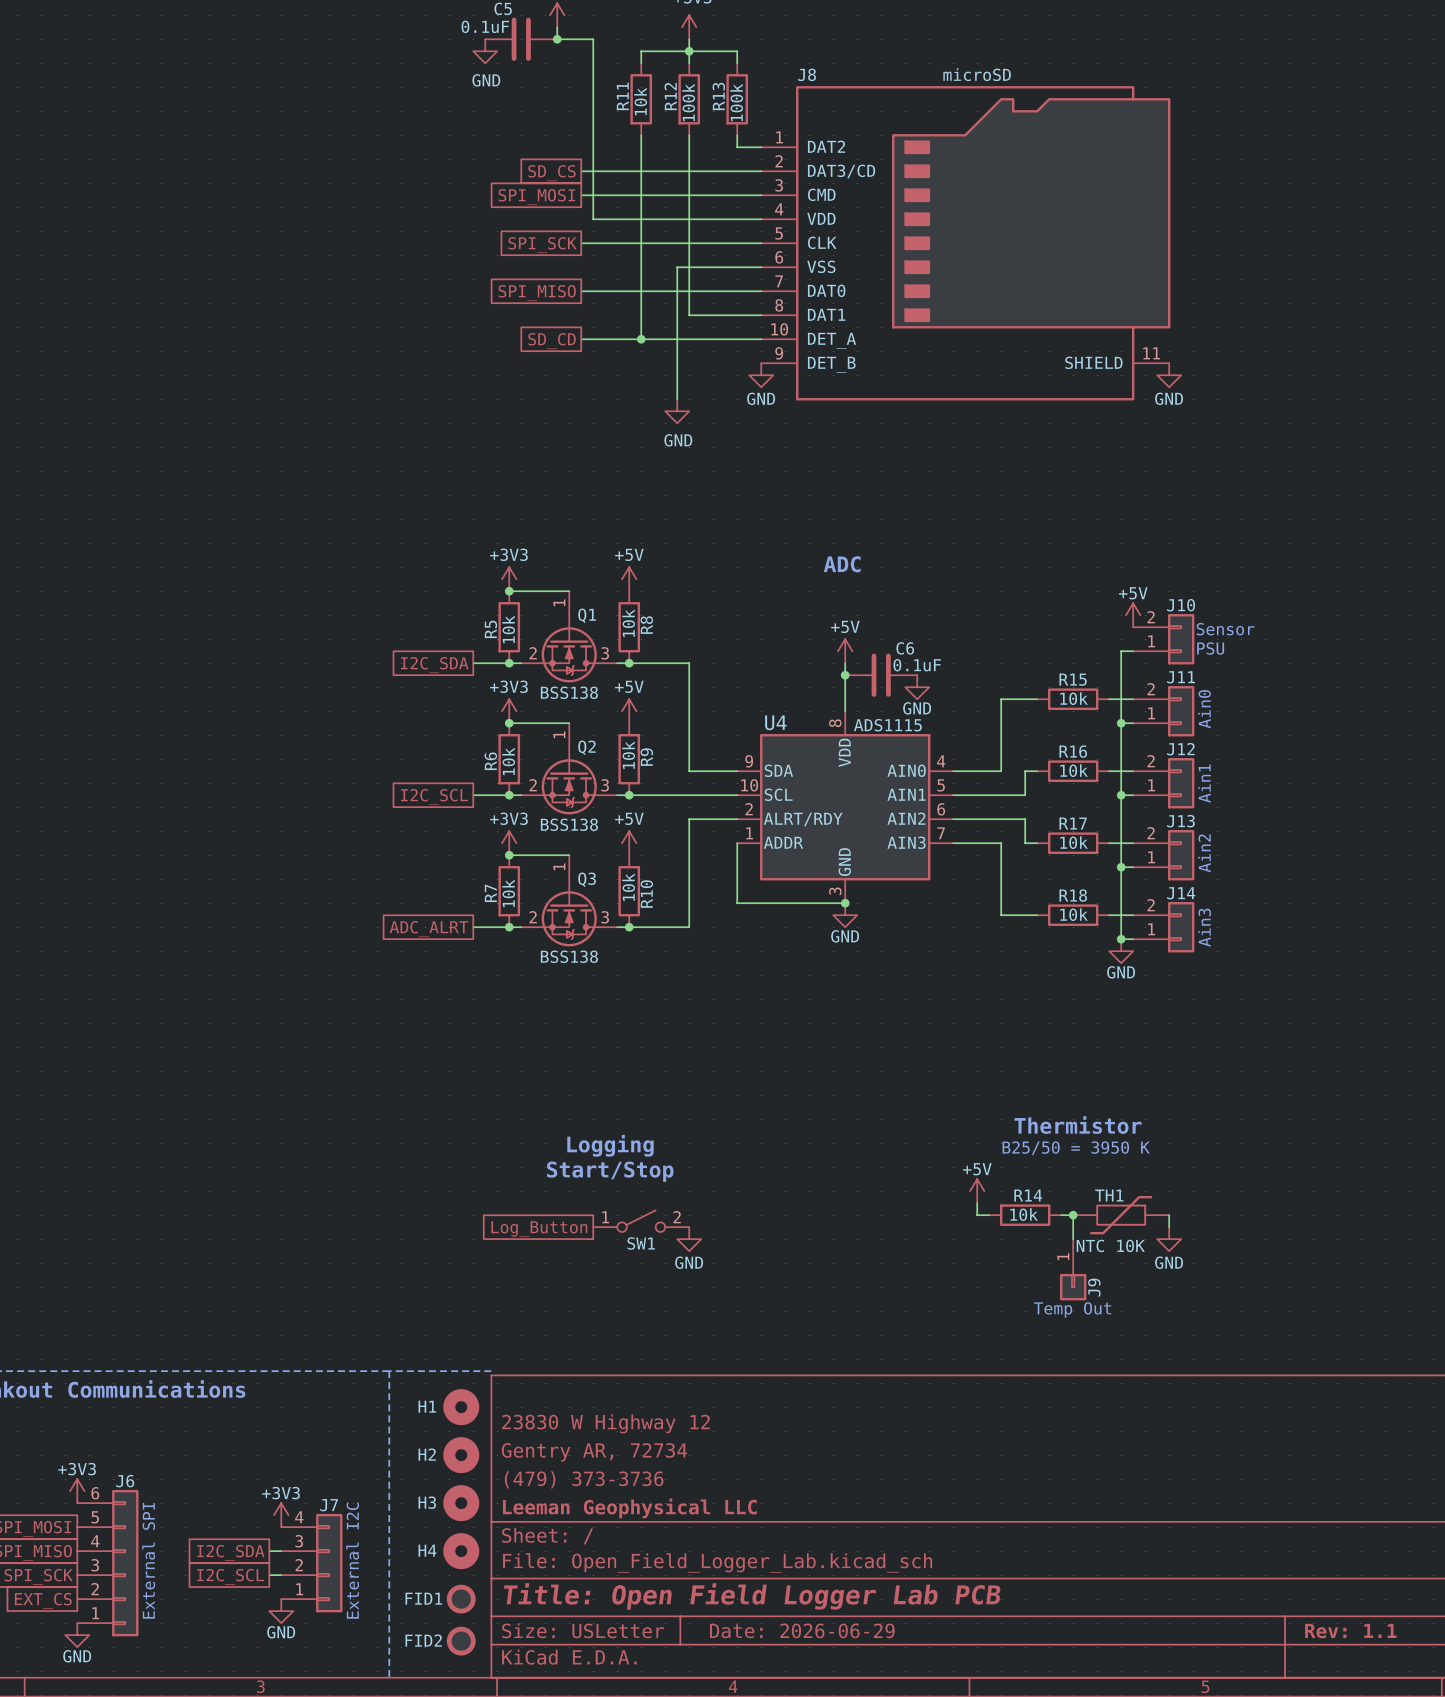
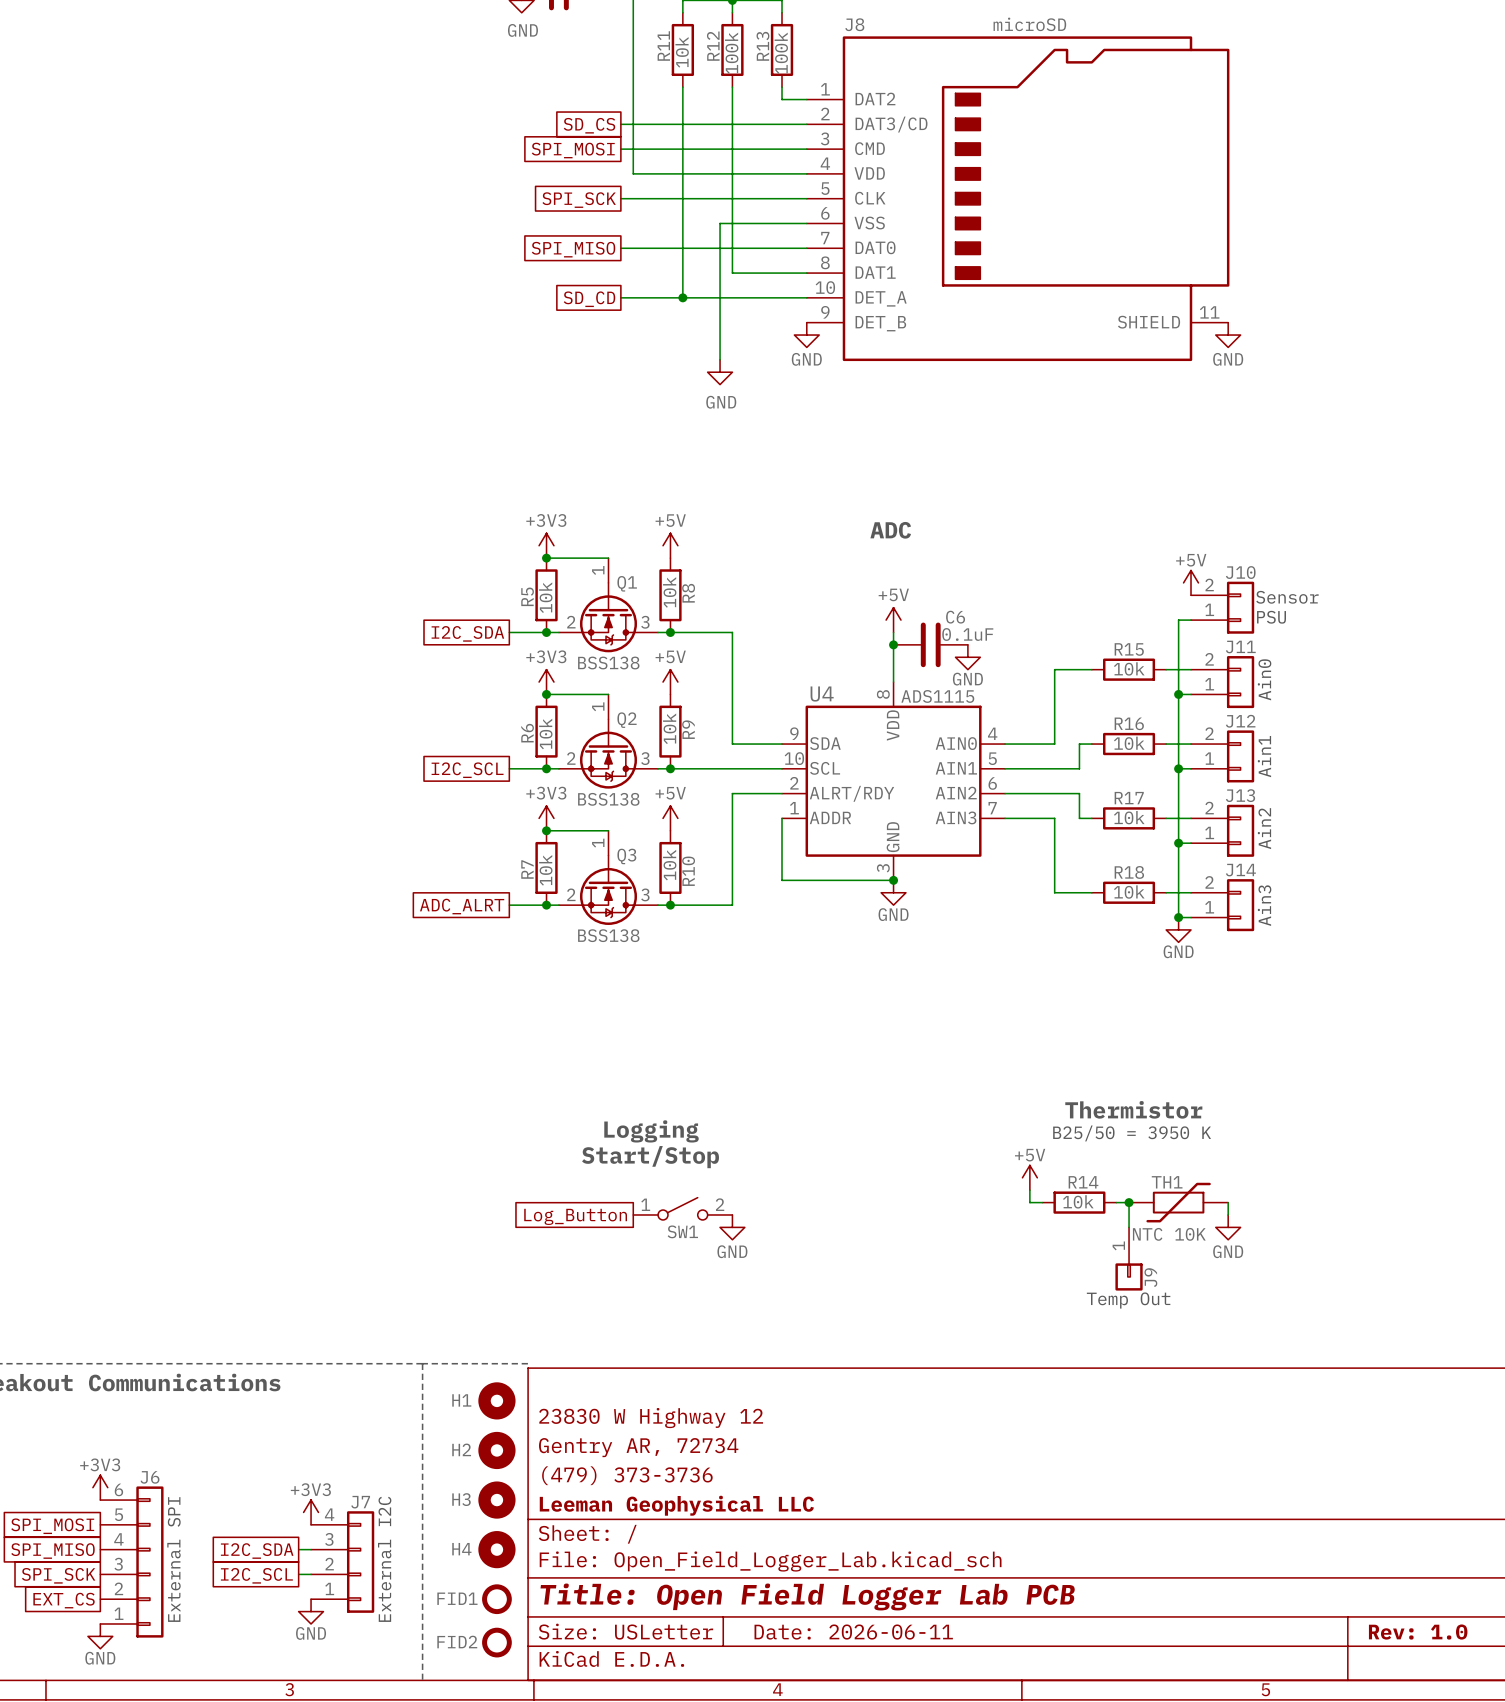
title block: Date: 2026-06-29 (802, 1630) -> Date: 2026-06-11 (853, 1632)
title block: Rev: 1.1 (1350, 1631) -> Rev: 1.0 (1418, 1632)

